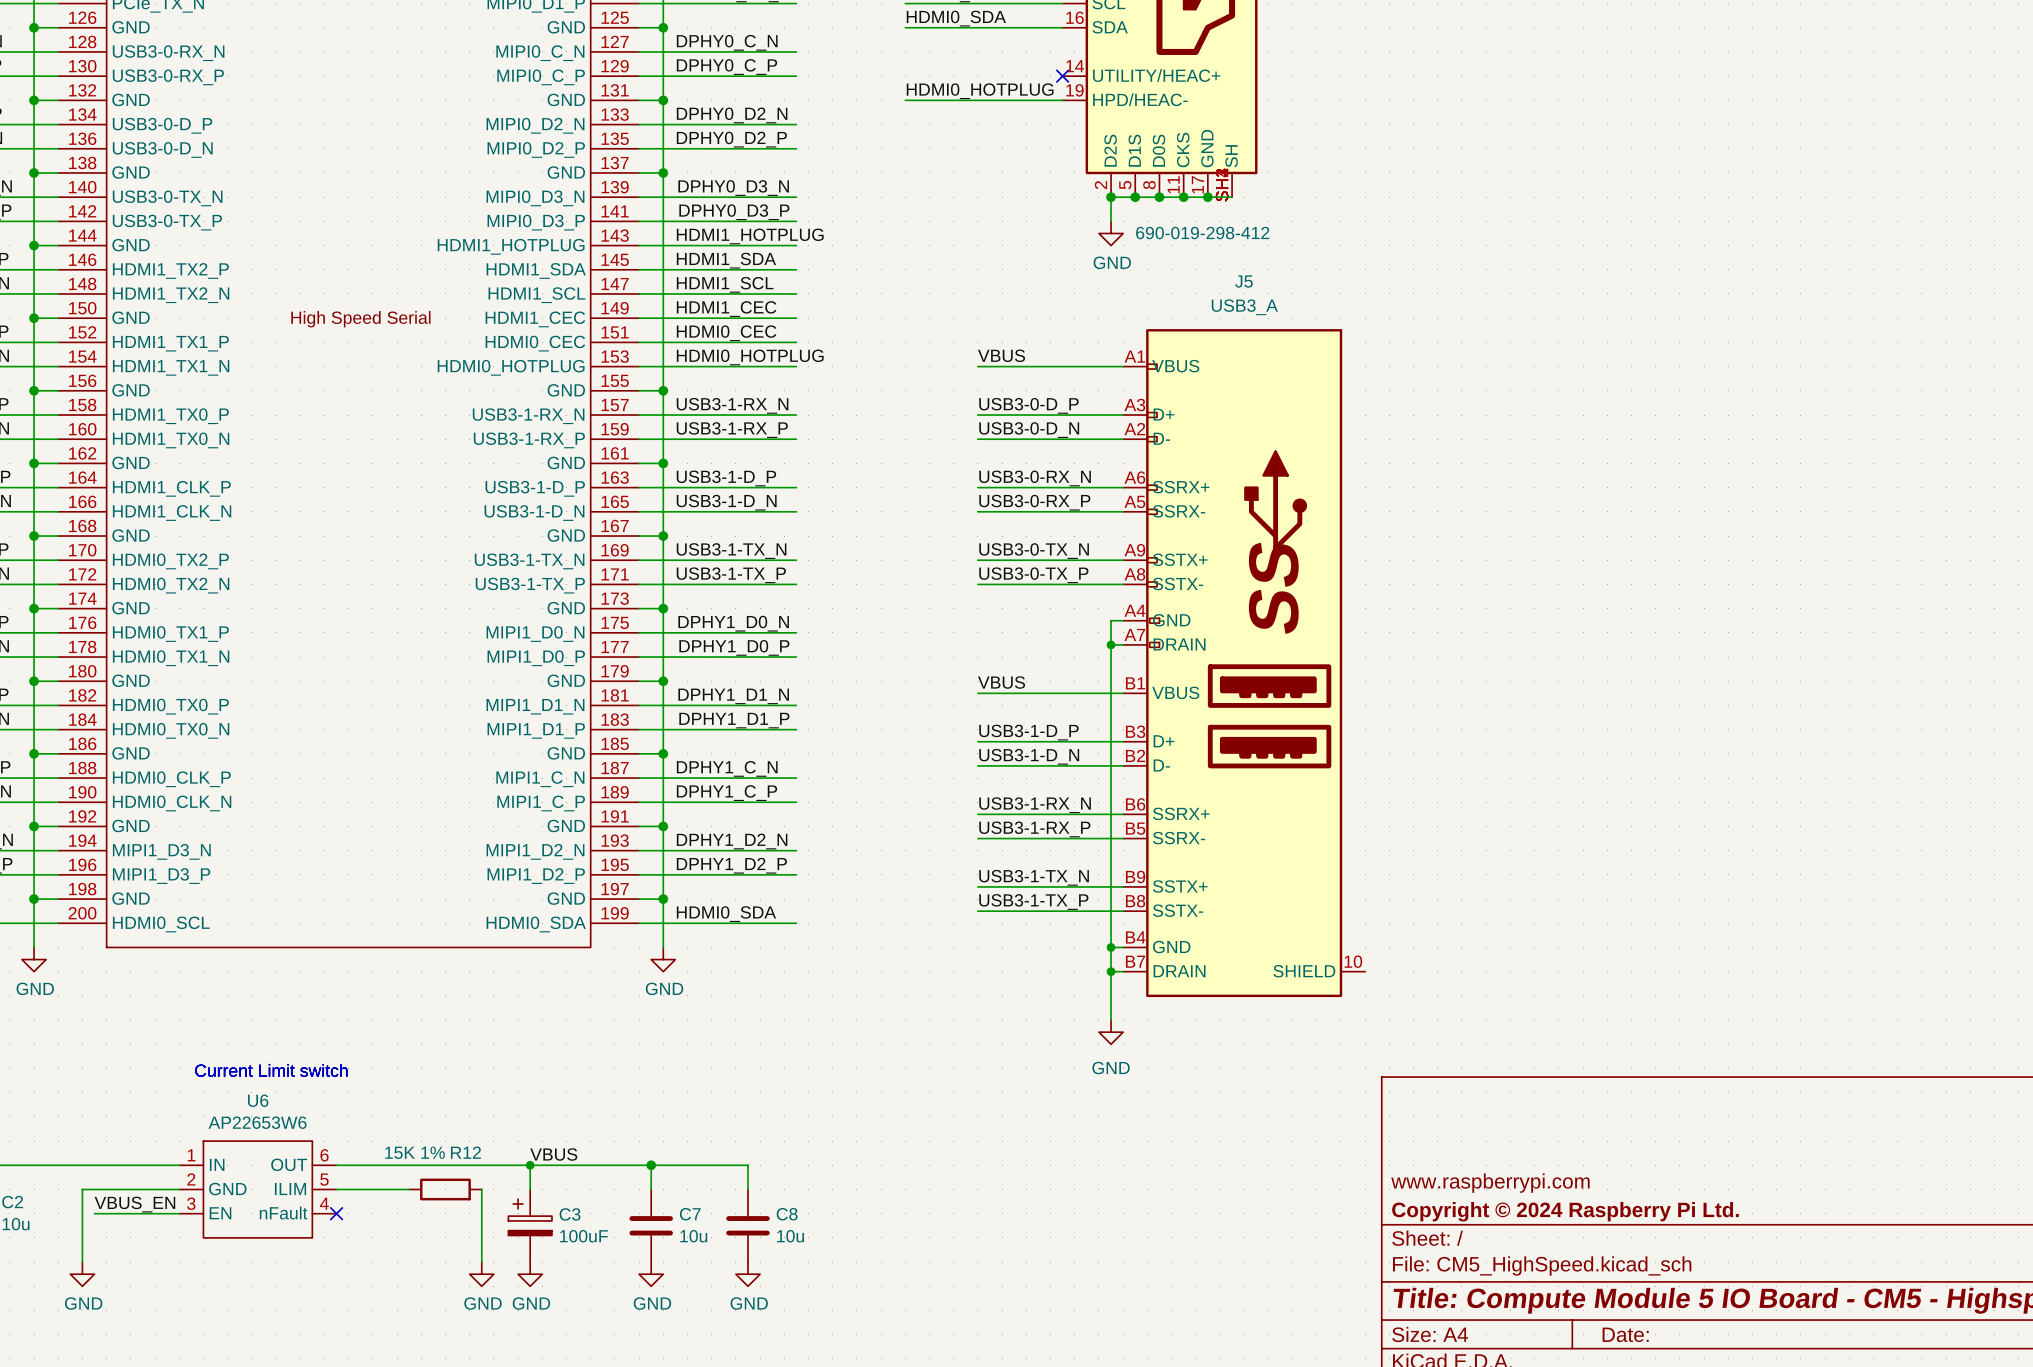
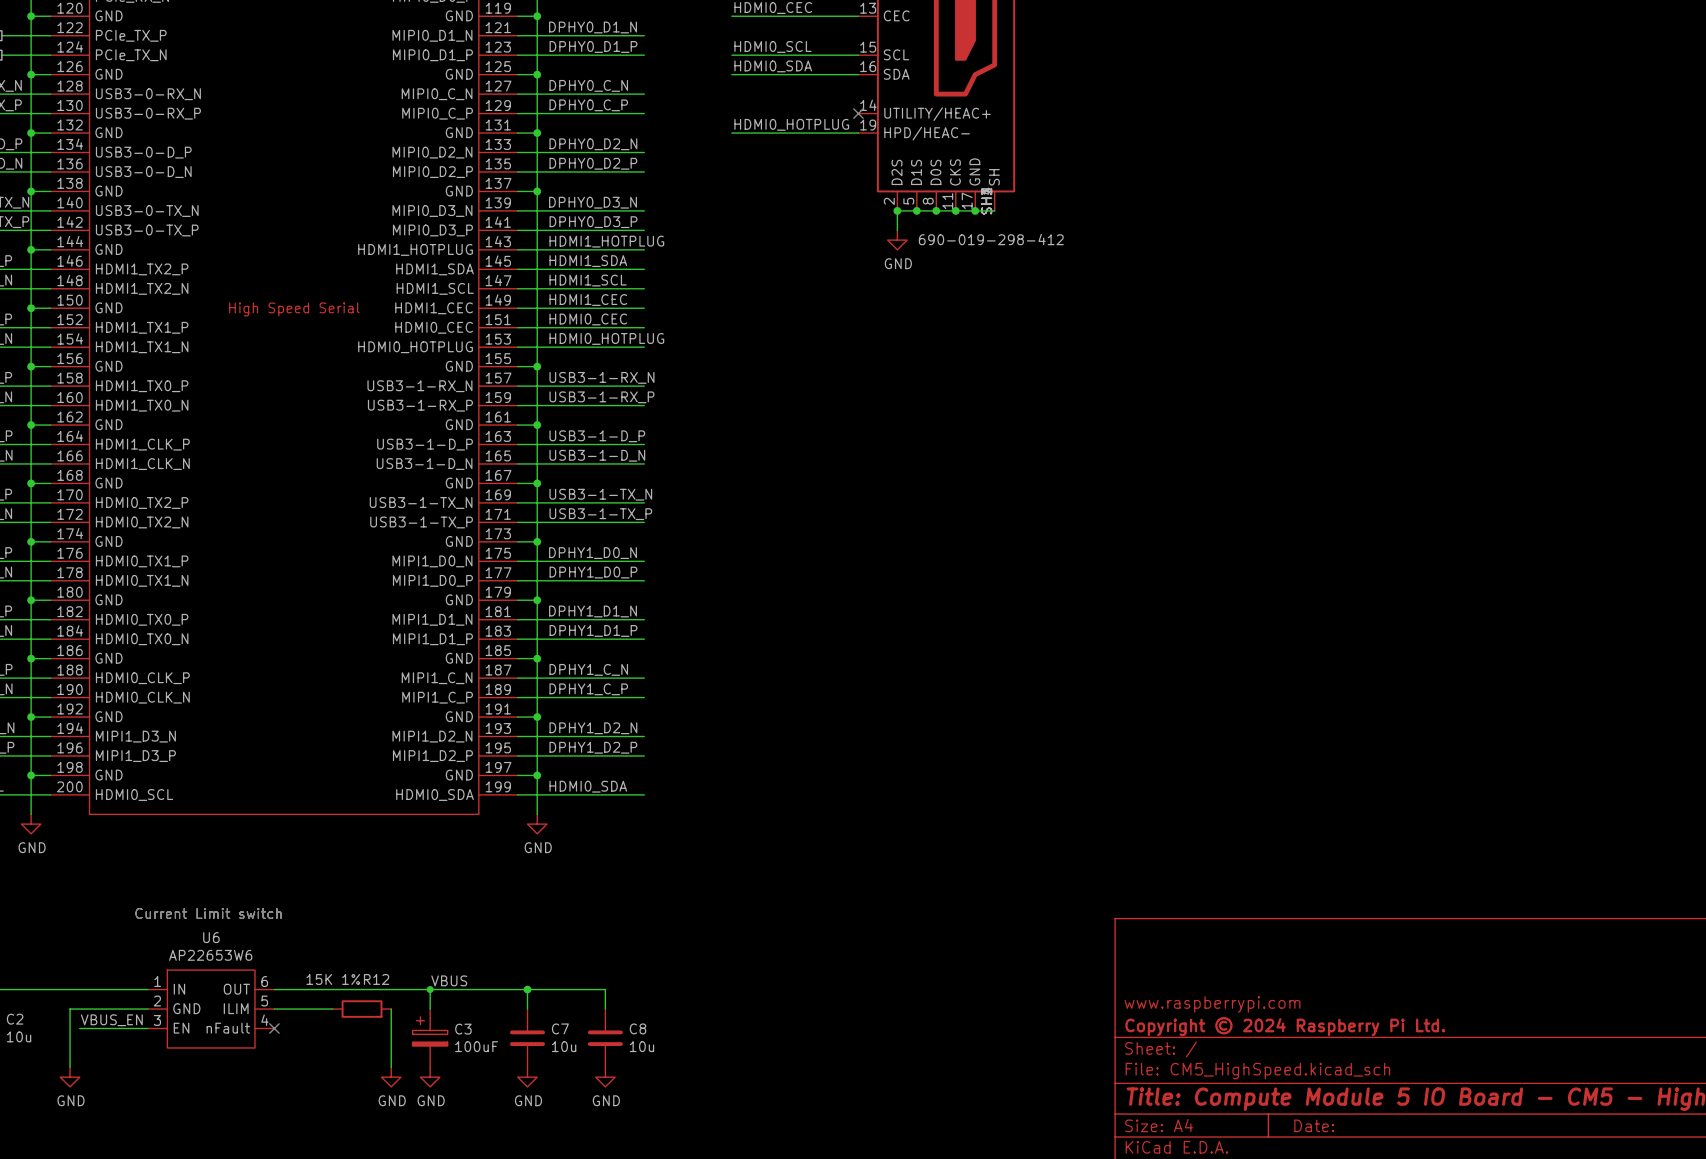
label: VBUS (1001, 355) -> none
wire: (977, 366) (1123, 366) -> none
label: USB3-0-D_P (1028, 405) -> none
wire: (977, 415) (1123, 415) -> none
label: USB3-0-D_N (1029, 430) -> none
wire: (977, 439) (1123, 439) -> none
label: USB3-0-RX_N (1035, 478) -> none
wire: (977, 487) (1123, 487) -> none
label: USB3-0-RX_P (1034, 502) -> none
wire: (977, 511) (1123, 511) -> none
label: USB3-0-TX_N (1034, 551) -> none
wire: (977, 560) (1123, 560) -> none
label: USB3-0-TX_P (1033, 575) -> none
wire: (977, 584) (1123, 584) -> none
wire: (1123, 620) (1111, 620) (1111, 1020) -> none
wire: (1111, 644) (1123, 644) -> none
junction: (1111, 644) -> none
J5: USB3_A (1244, 663) -> none
label: VBUS (1001, 682) -> none
wire: (977, 693) (1123, 693) -> none
label: USB3-1-D_P (1028, 732) -> none
wire: (977, 741) (1123, 741) -> none
label: USB3-1-D_N (1029, 756) -> none
wire: (977, 765) (1123, 765) -> none
label: USB3-1-RX_N (1035, 805) -> none
wire: (977, 814) (1123, 814) -> none
label: USB3-1-RX_P (1034, 829) -> none
wire: (977, 838) (1123, 838) -> none
label: USB3-1-TX_N (1034, 877) -> none
wire: (977, 886) (1123, 886) -> none
label: USB3-1-TX_P (1033, 902) -> none
wire: (977, 911) (1123, 911) -> none
wire: (1111, 947) (1123, 947) -> none
junction: (1111, 947) -> none
wire: (1111, 971) (1123, 971) -> none
junction: (1111, 971) -> none
power symbol: GND (1111, 1032) -> none

